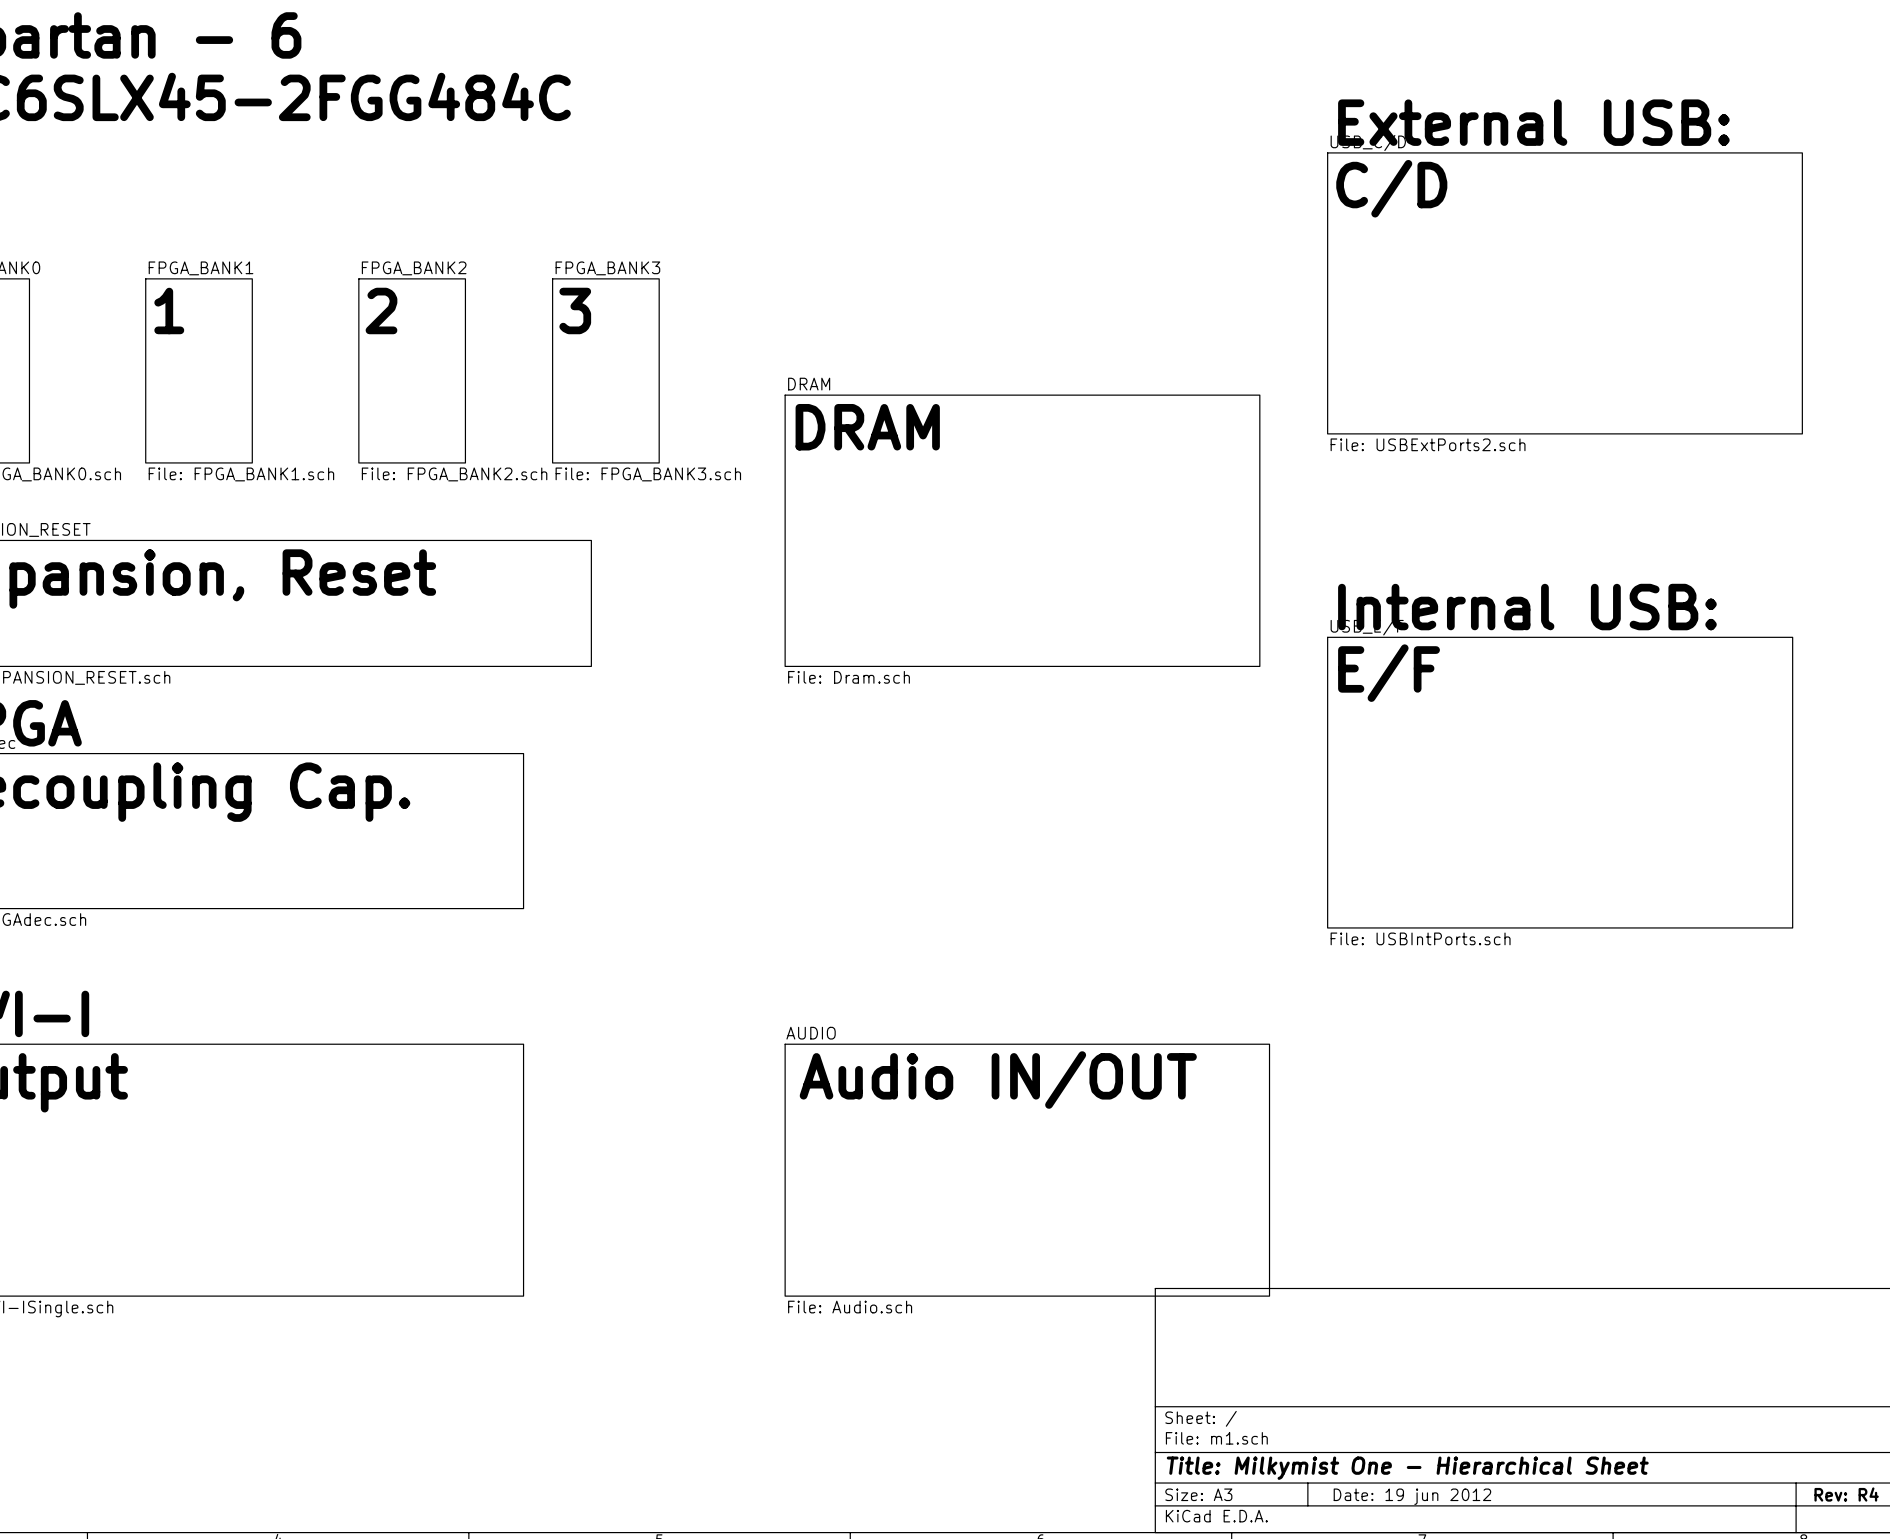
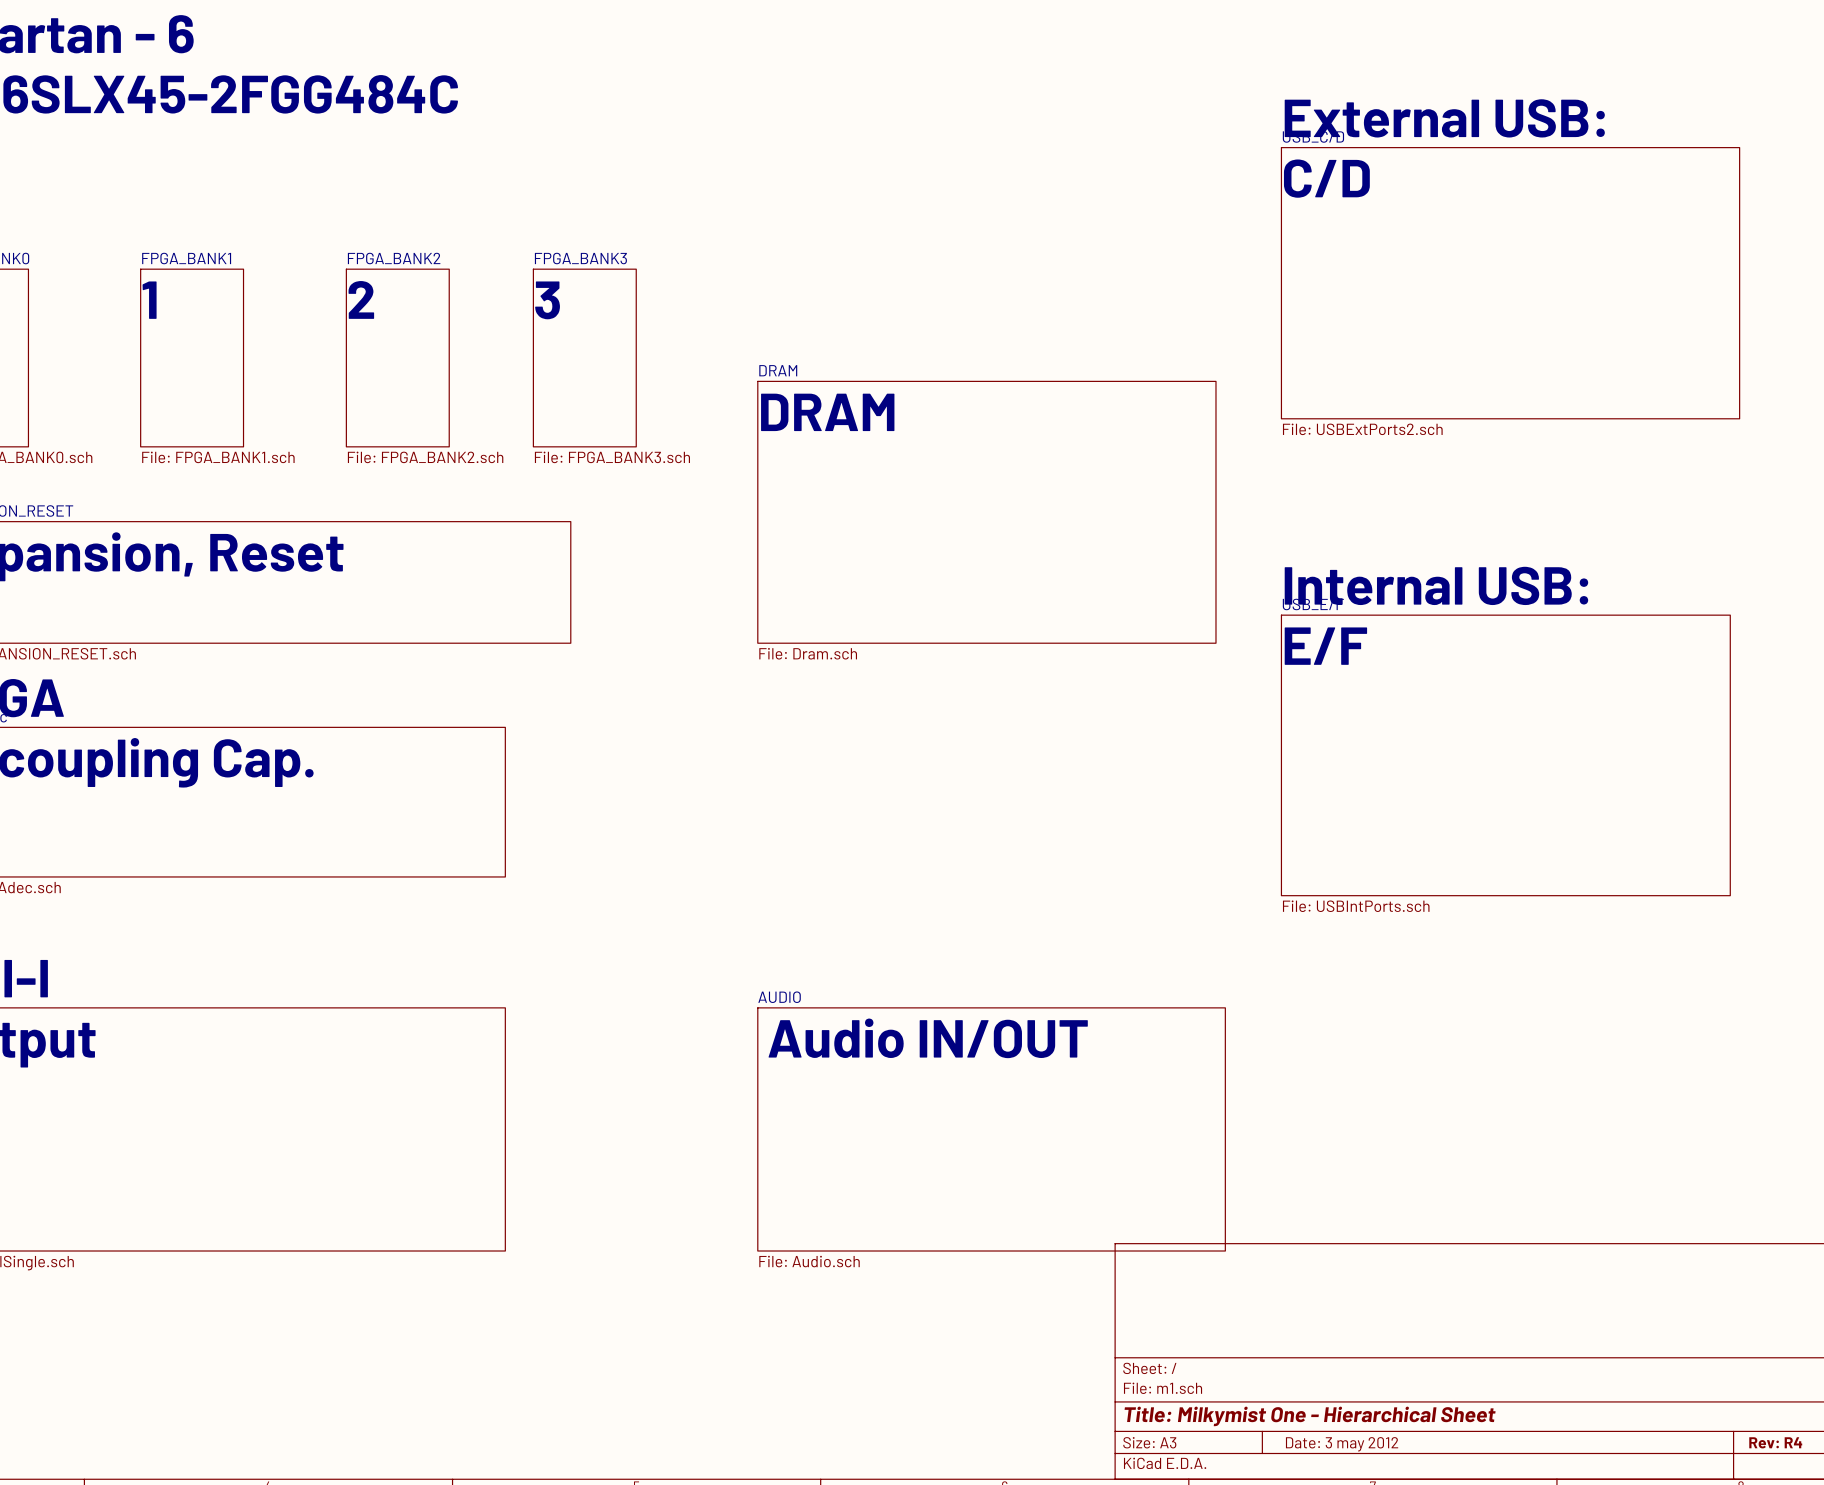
title block: Date: 19 jun 2012 (1412, 1496) -> Date: 3 may 2012 (1342, 1444)

